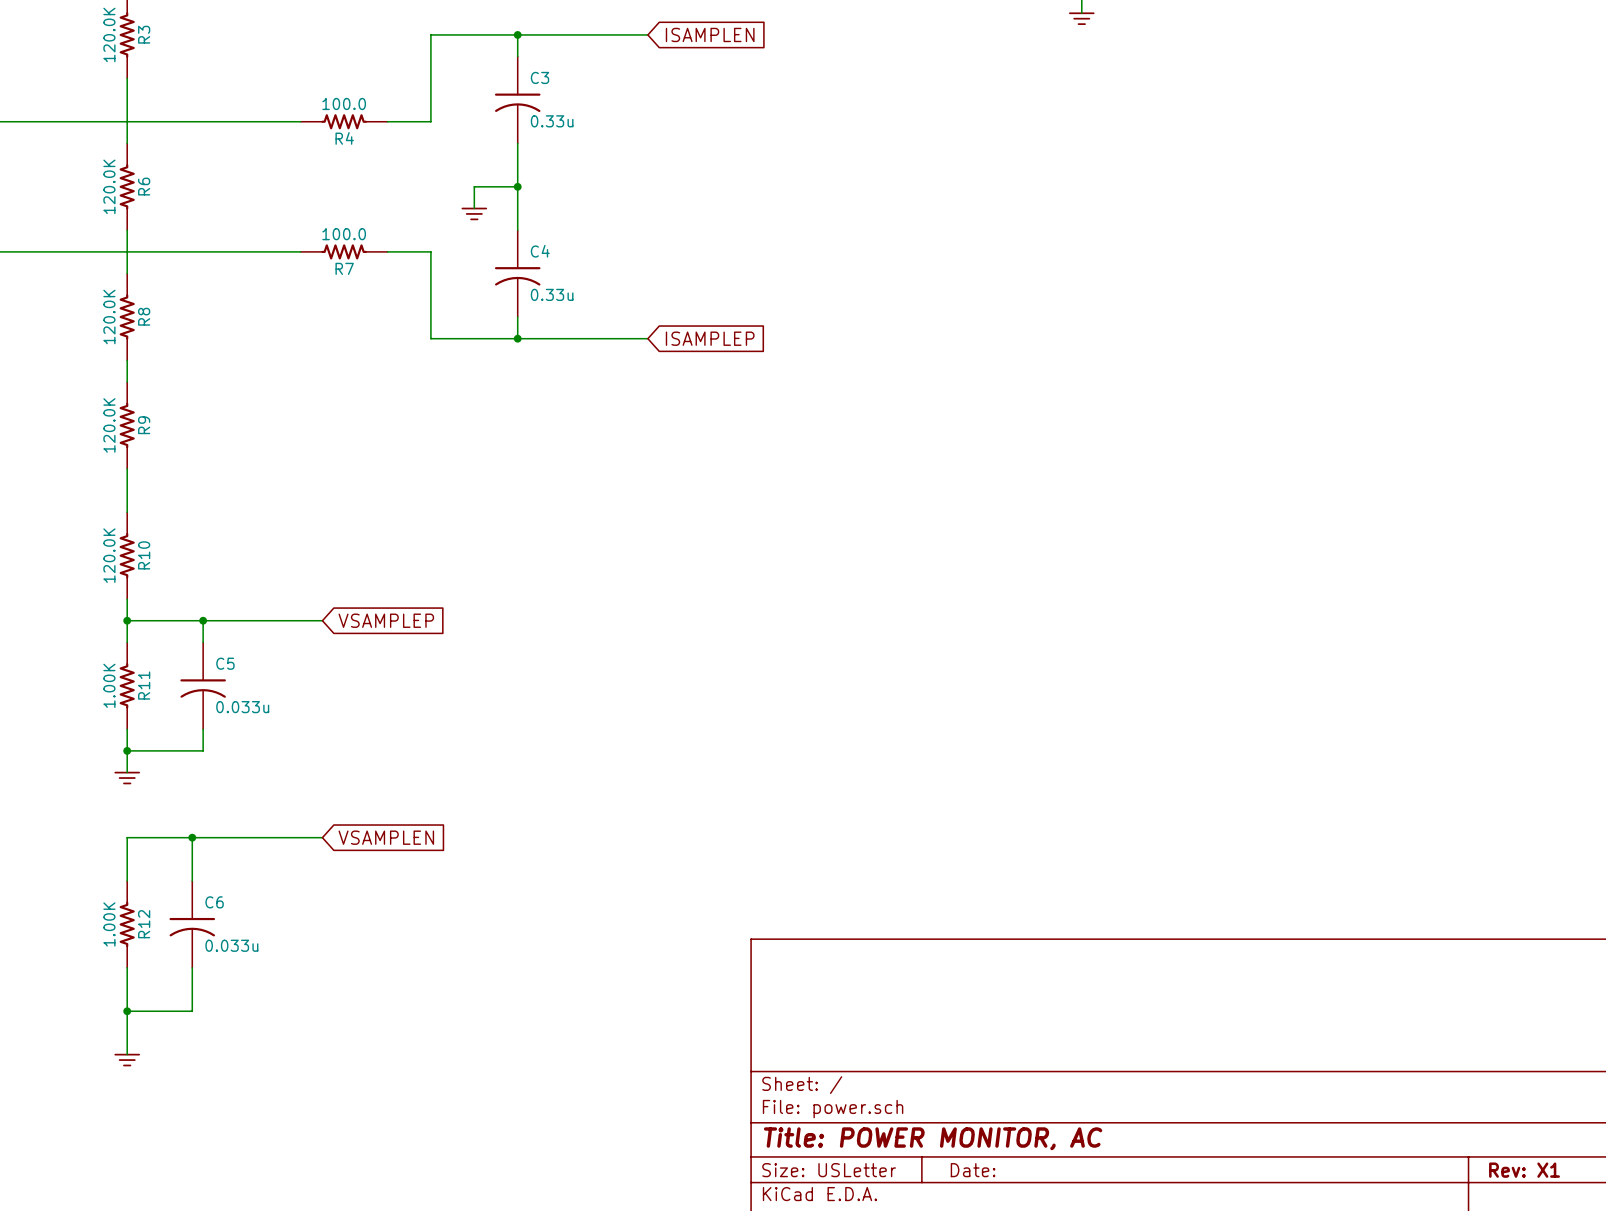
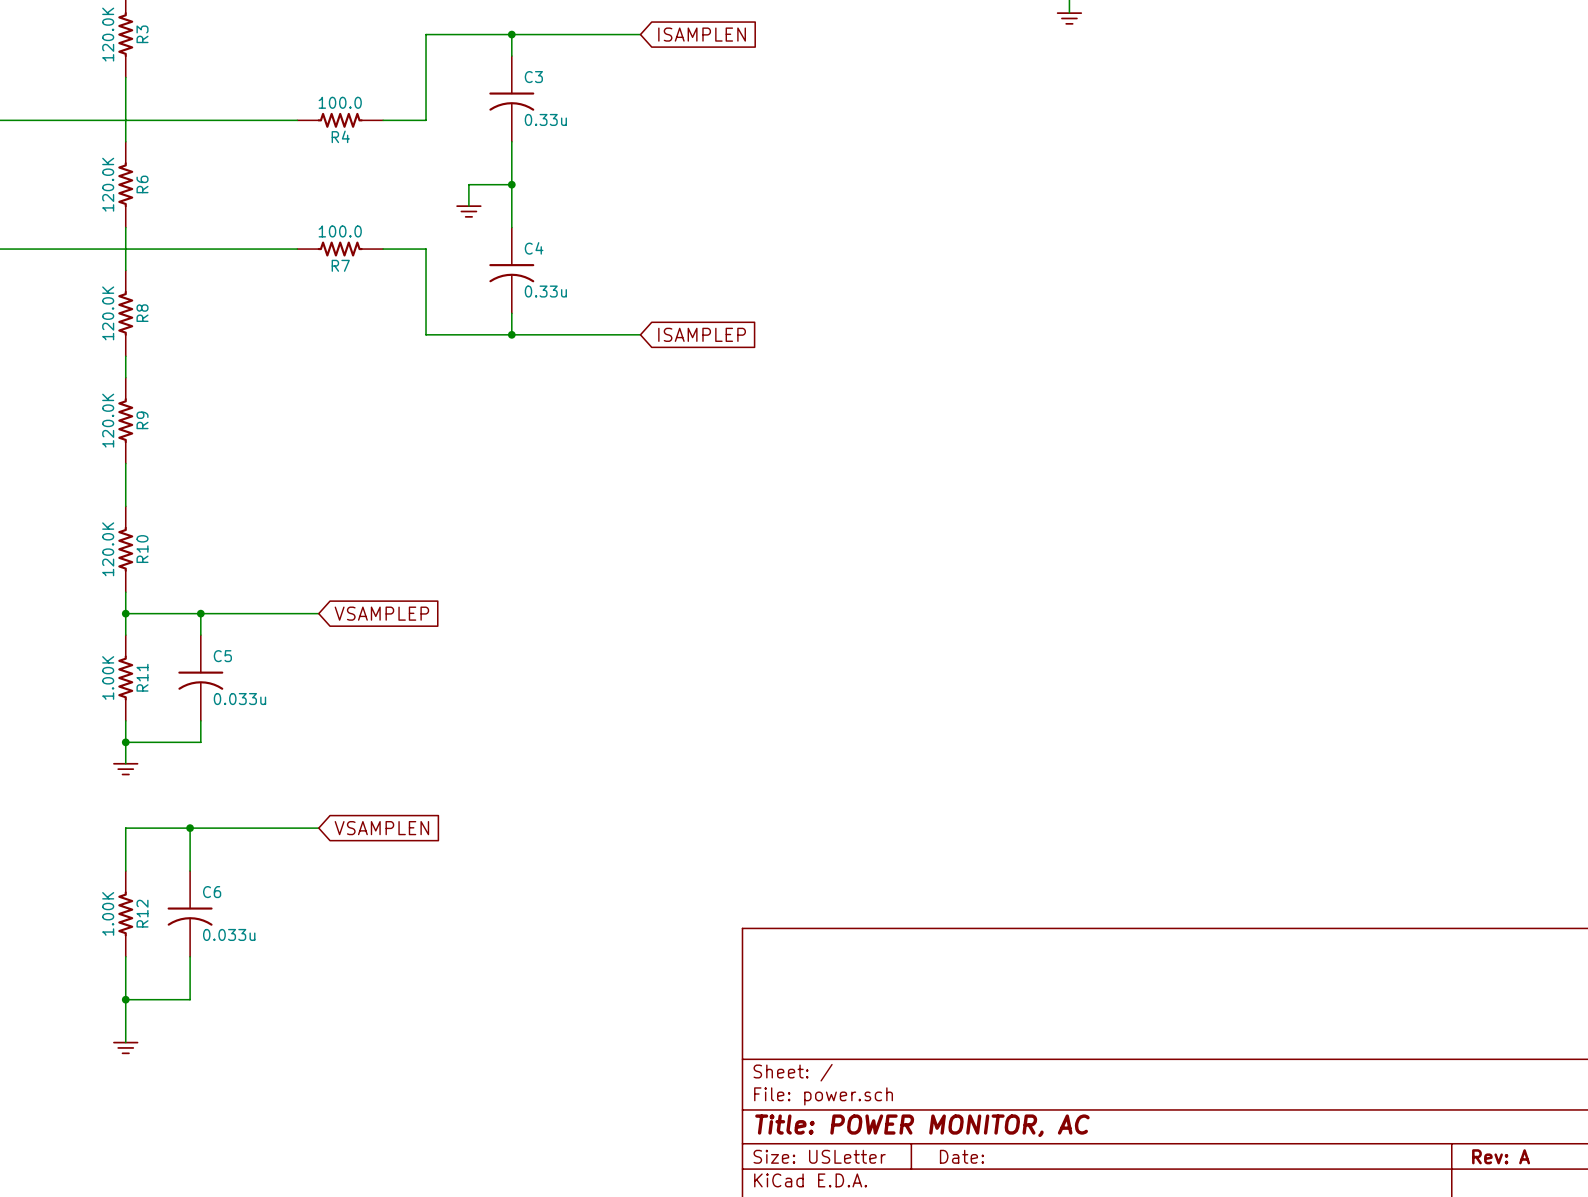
title block: Rev: X1 (1524, 1170) -> Rev: A (1501, 1156)

